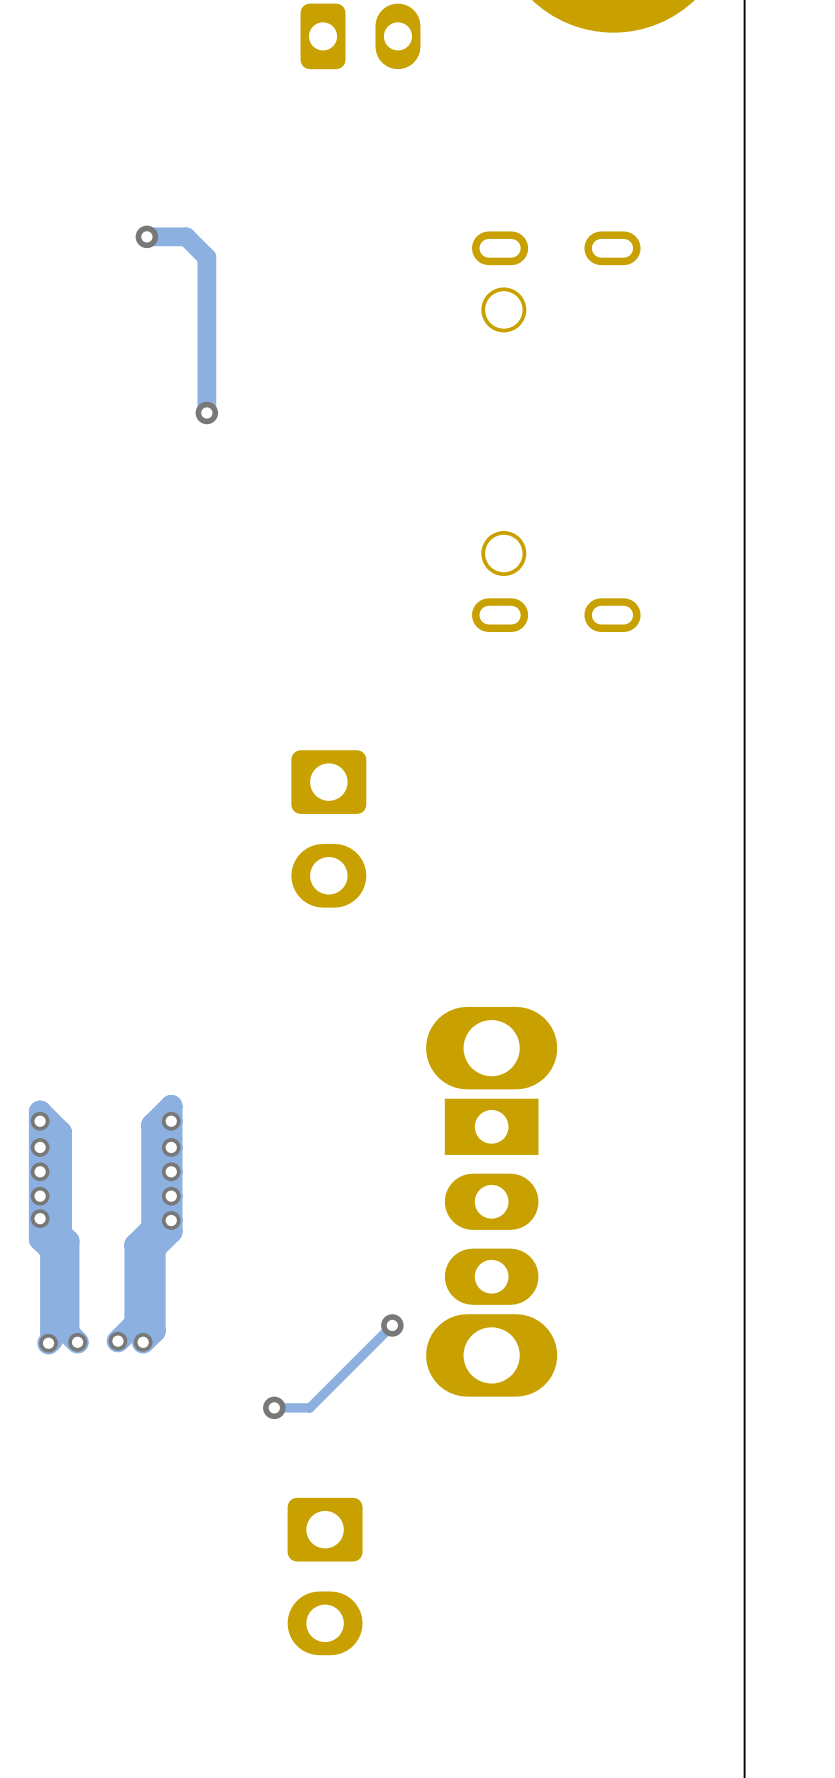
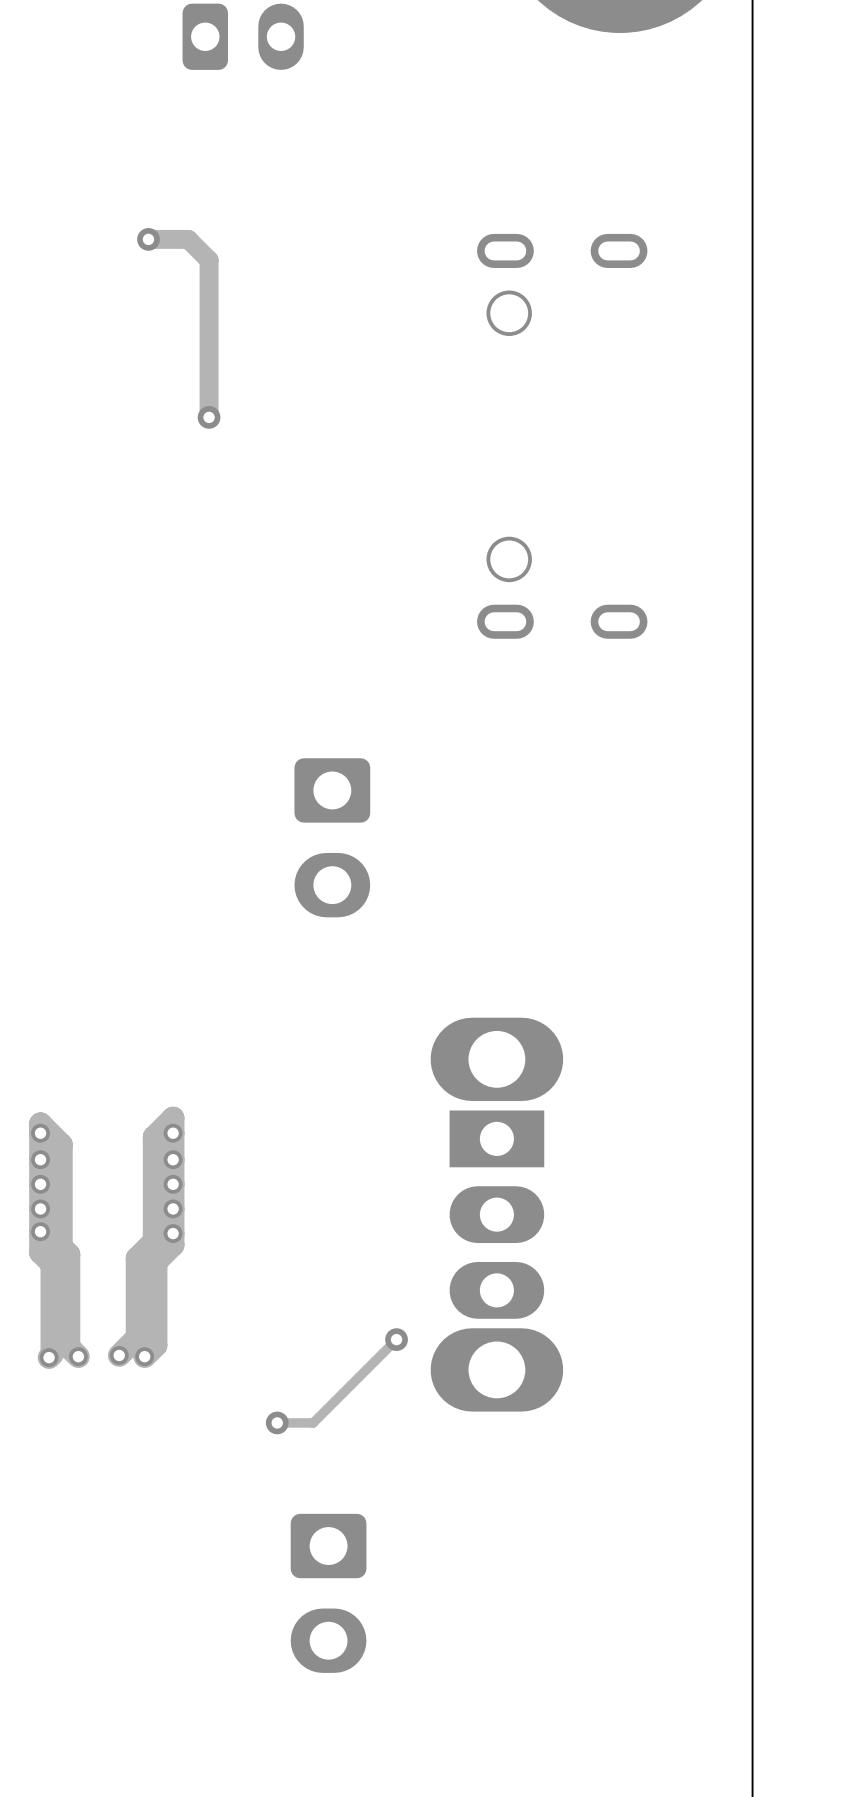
part position: (360, 36) -> (243, 36)

